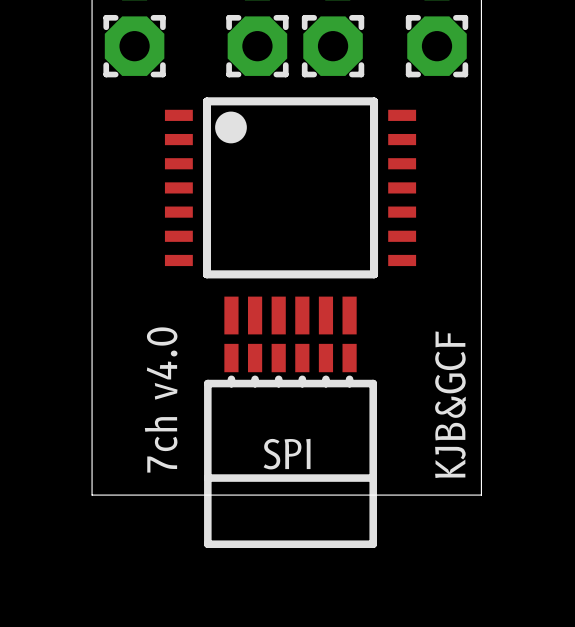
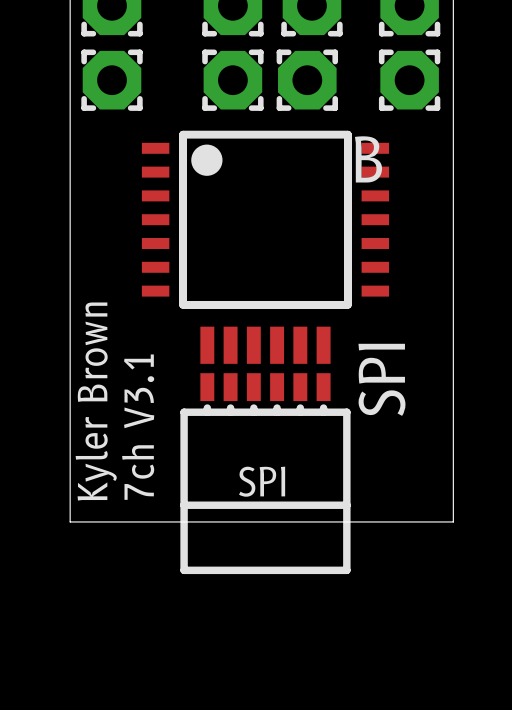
text: none -> B (368, 159)
SPI name: none -> SPI (381, 379)
text: none -> Kyler Brown (96, 401)
text: 7ch v4.0 (161, 399) -> 7ch V3.1 (138, 427)
text: KJB&GCF (450, 404) -> none

